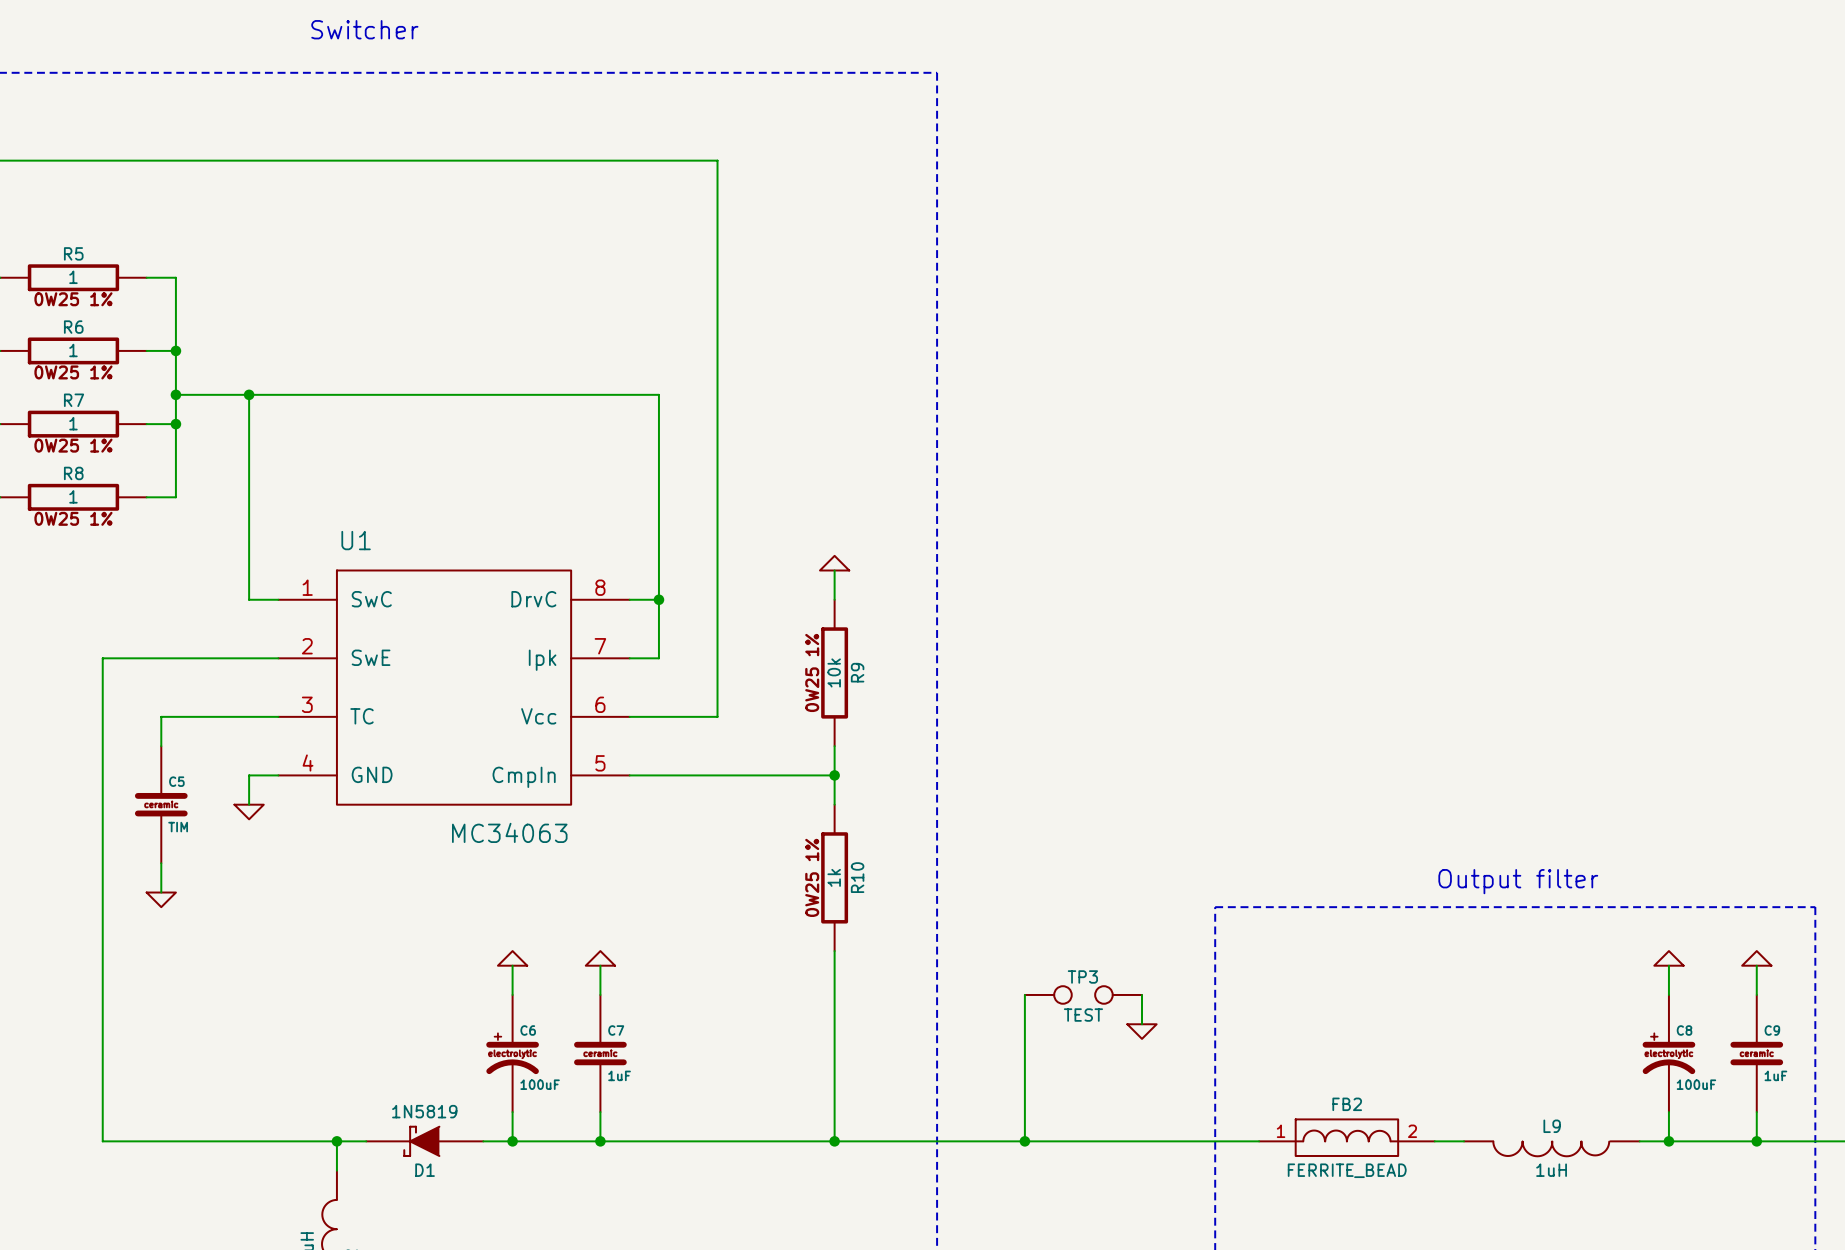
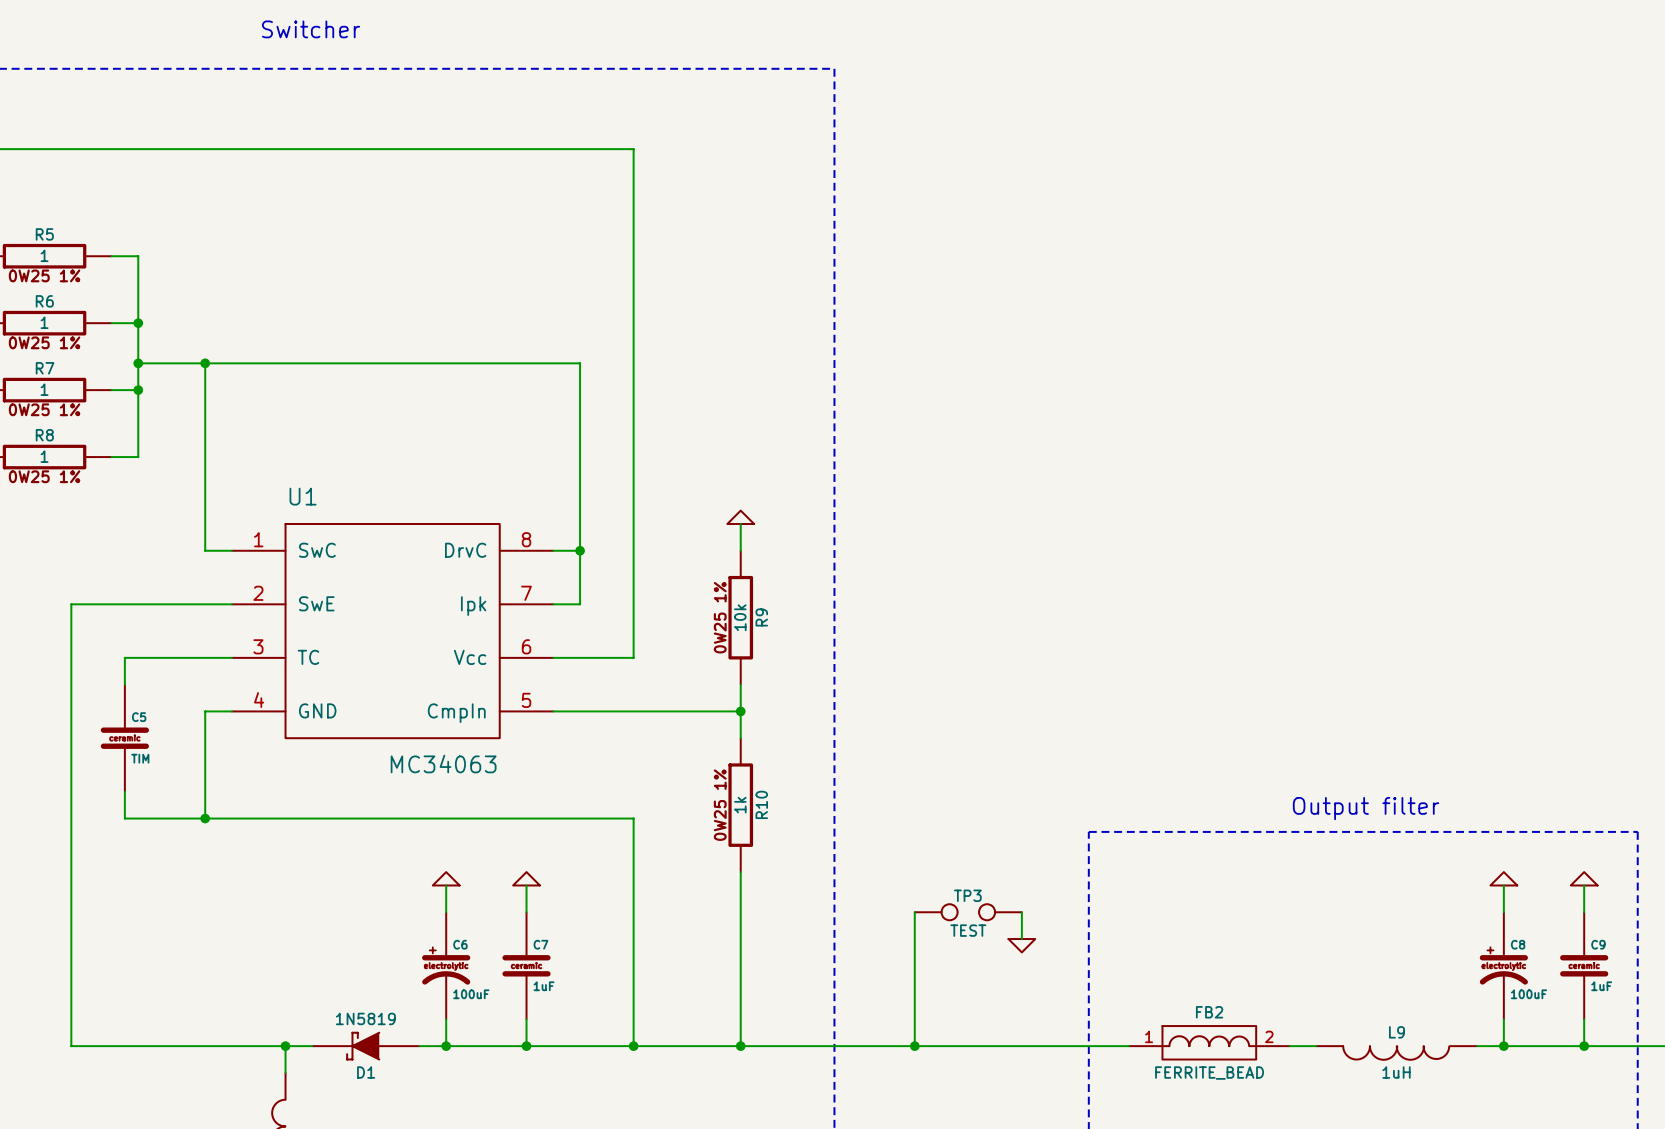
wire: none -> (205, 738) (205, 818)
power symbol: (249, 812) -> none
wire: none -> (124, 818) (633, 818) (633, 1046)
junction: none -> (205, 818)
power symbol: (161, 899) -> none
junction: none -> (633, 1046)

